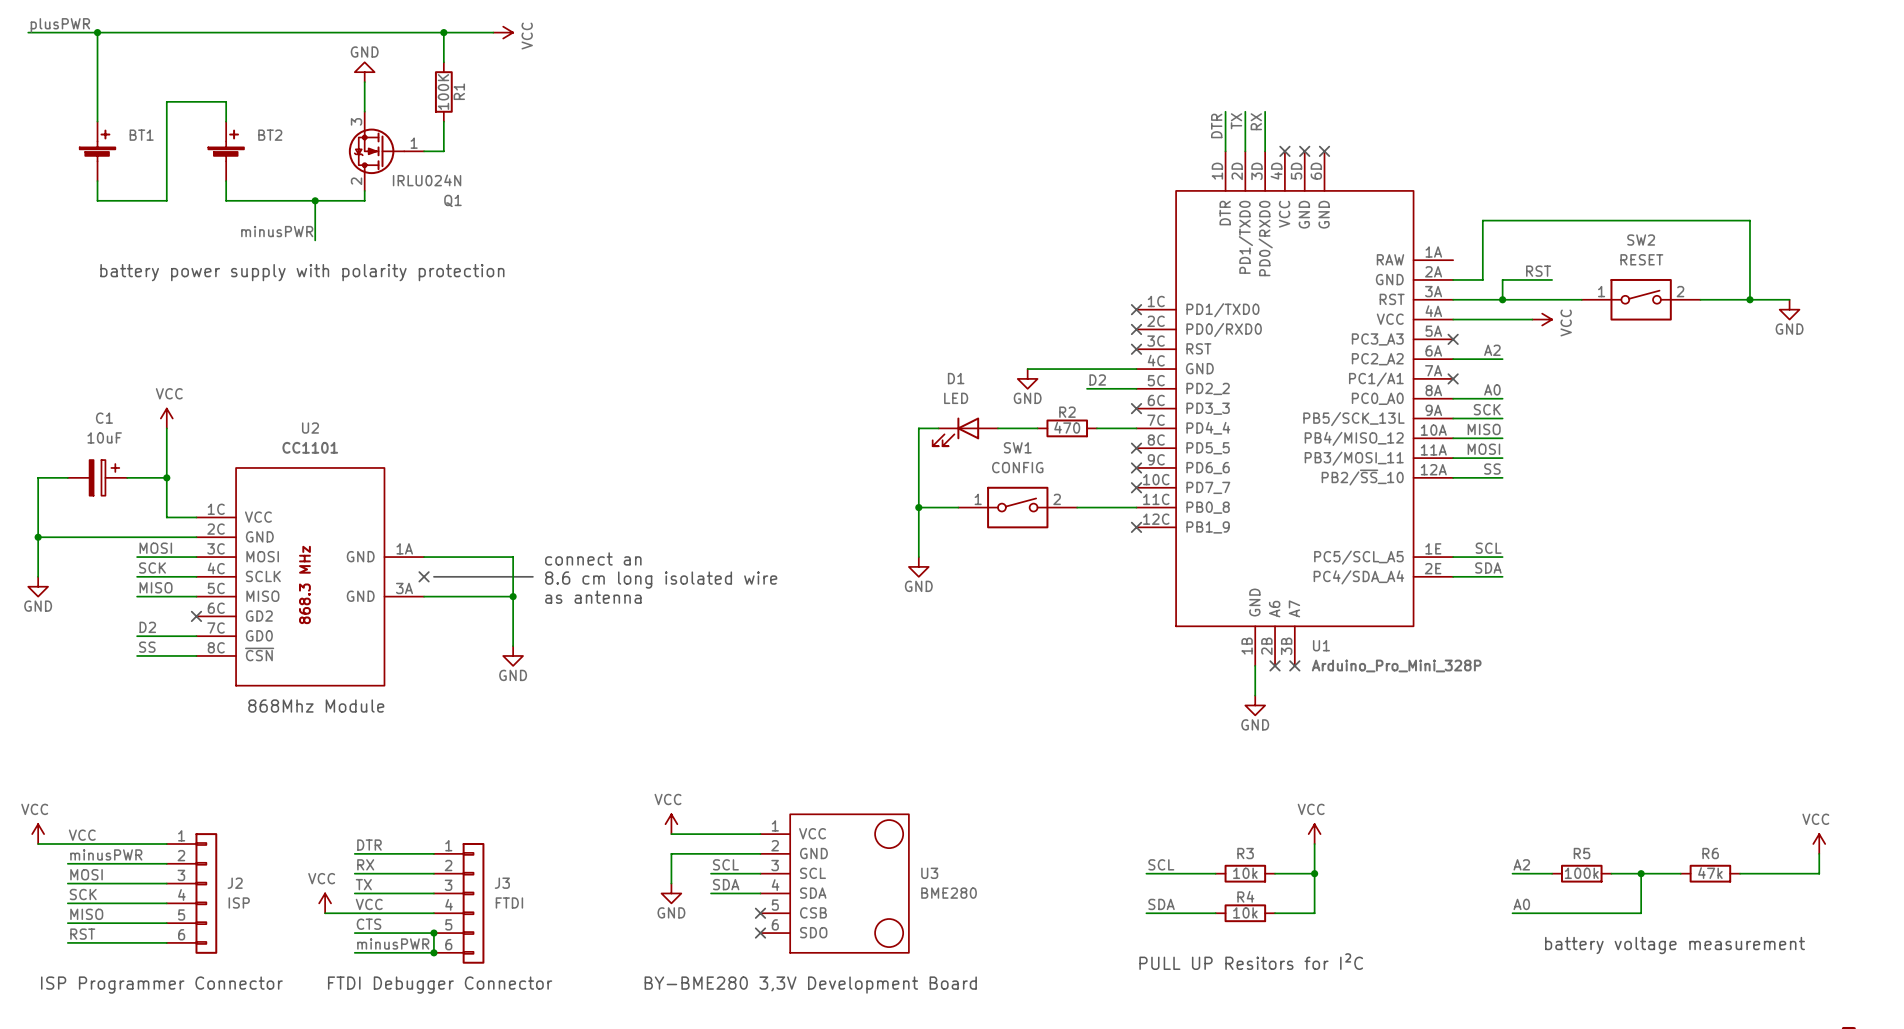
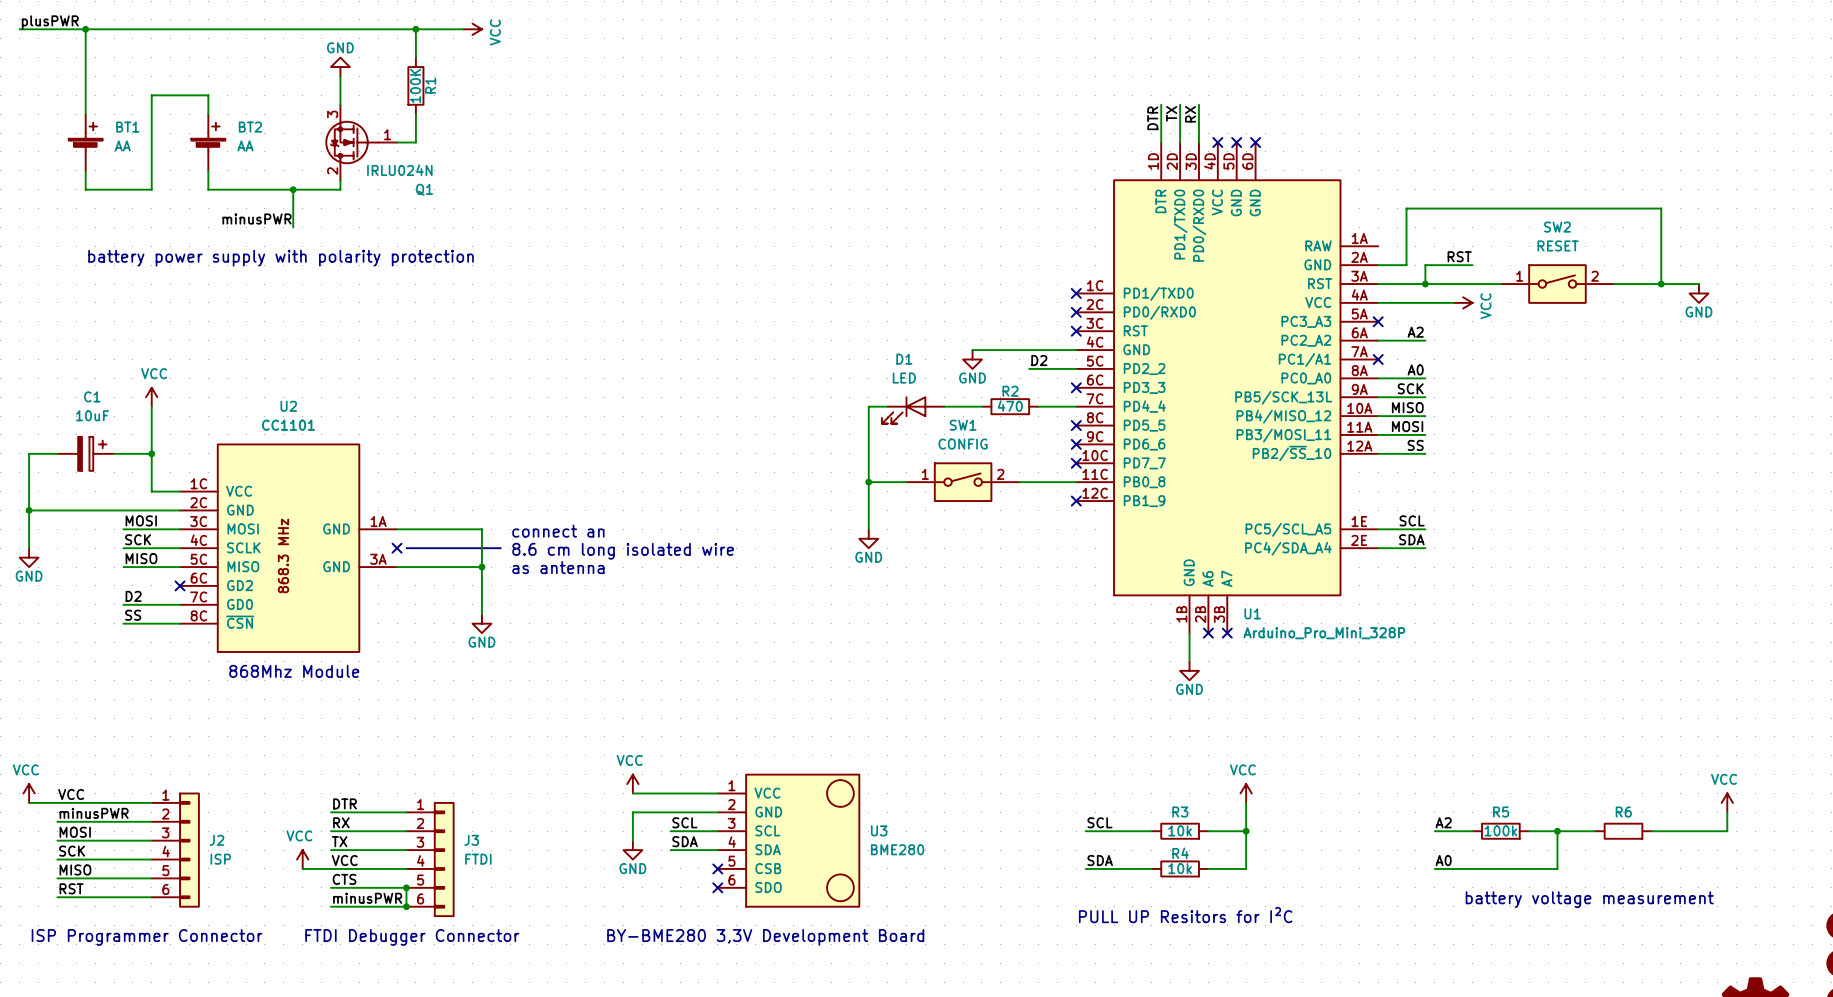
BT1 value: none -> AA (122, 145)
BT2 value: none -> AA (245, 145)
R6 value: 47k (1710, 873) -> none

